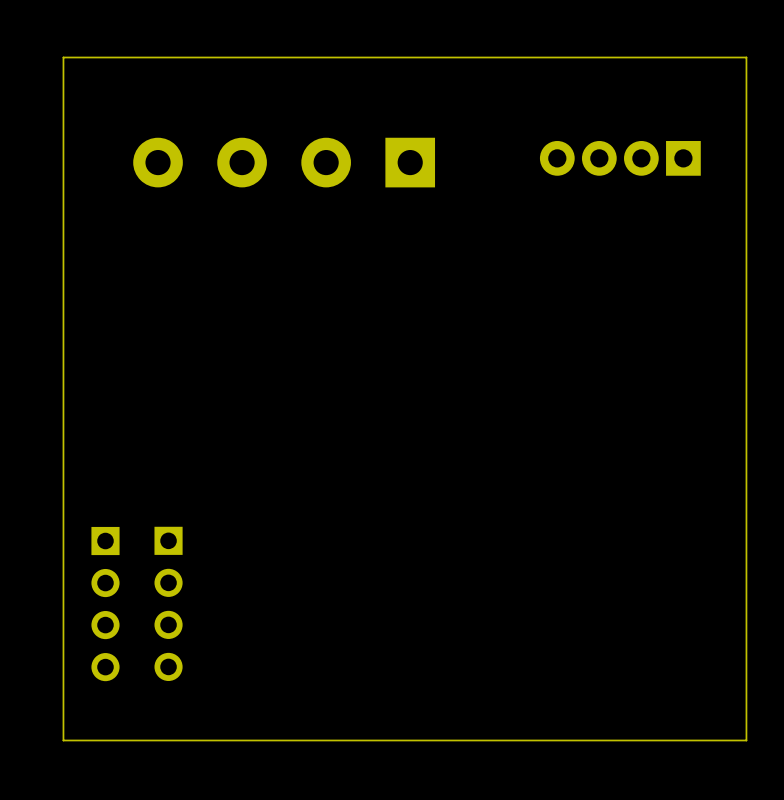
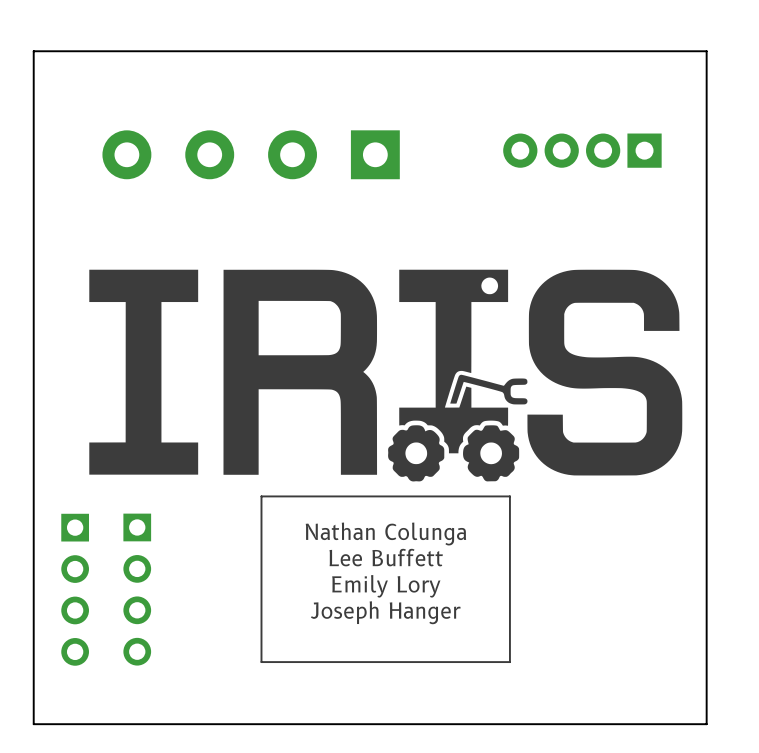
drawing: none -> [89, 269, 683, 482]
line: none -> (509, 496) (261, 496) (261, 662) (509, 662) (509, 496)
text: none -> Nathan Colunga (385, 534)
text: none -> Lee Buffett (386, 557)
text: none -> Emily Lory (386, 586)
text: none -> Joseph Hanger (385, 612)

